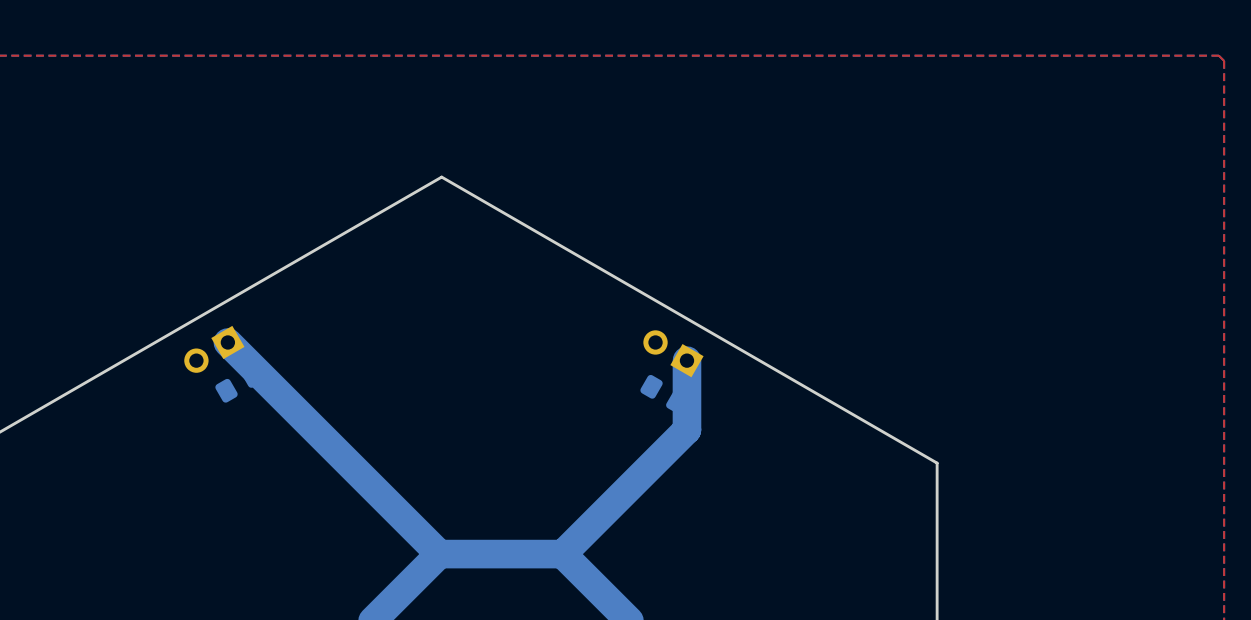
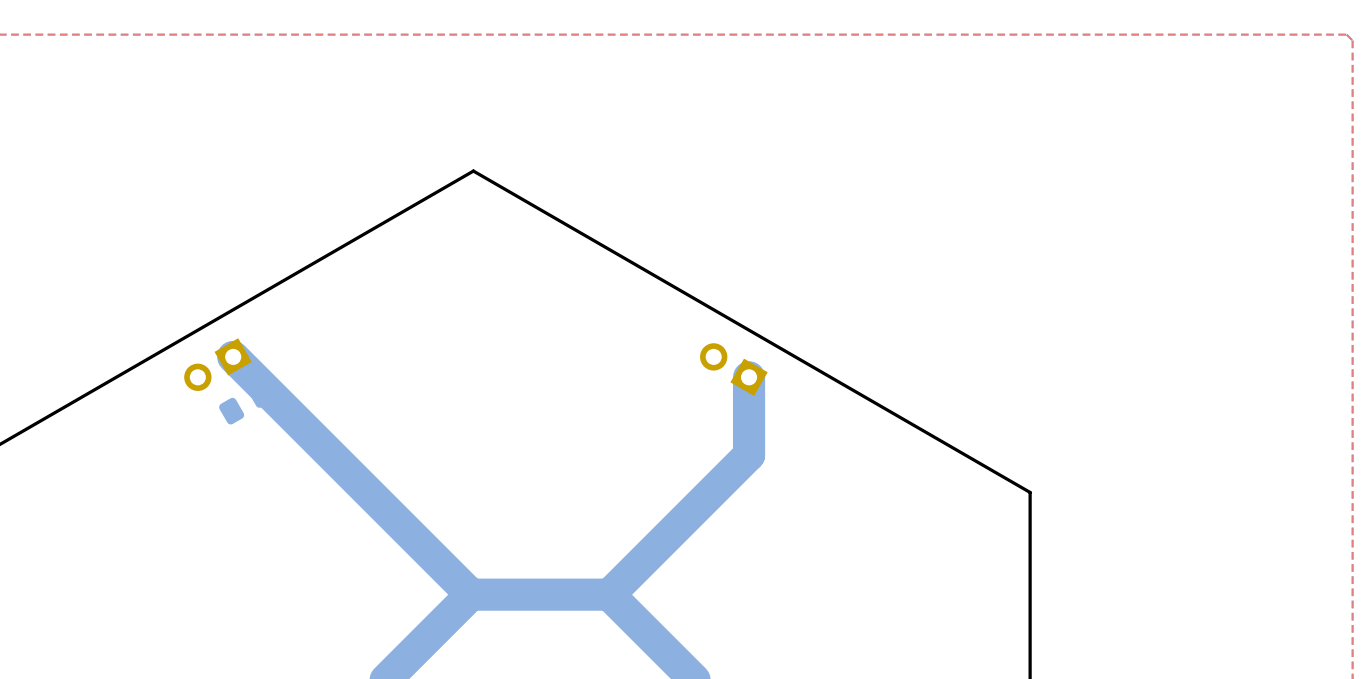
part: (664, 394) -> none

